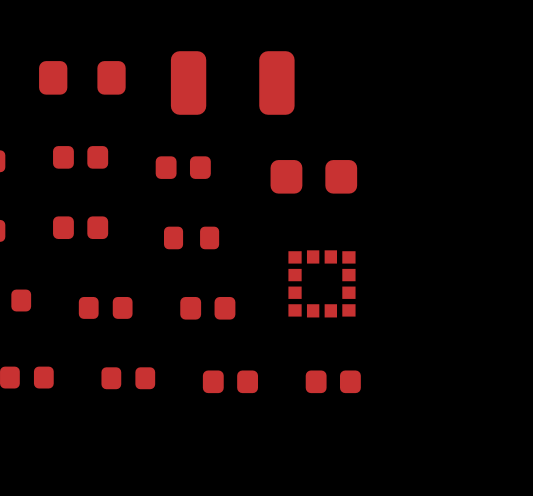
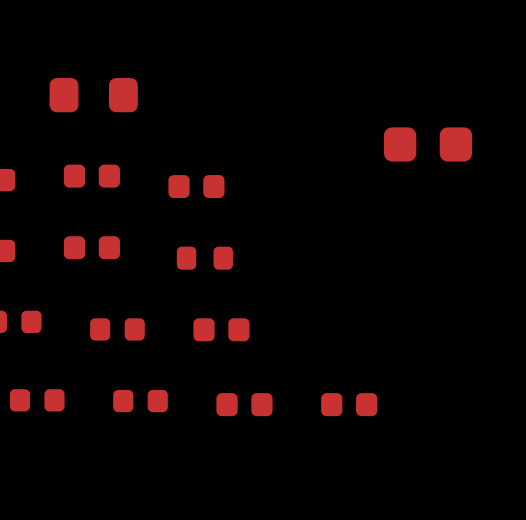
part: (232, 82) -> none
part position: (313, 176) -> (428, 144)
part: (321, 283) -> none

